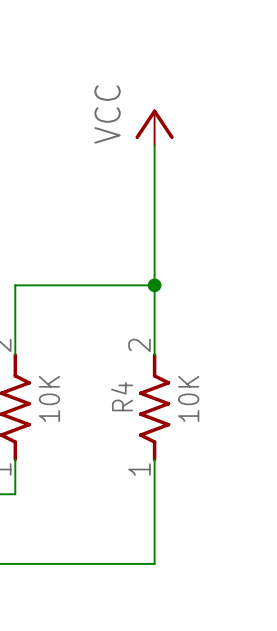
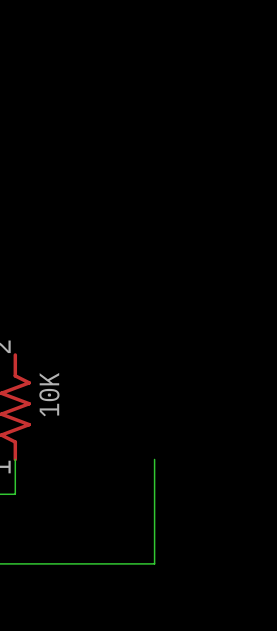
power symbol: VCC (154, 127) -> none
wire: (154, 146) (154, 354) -> none
wire: (154, 285) (15, 285) (15, 354) -> none
junction: (154, 285) -> none
R4: 10K (154, 407) -> none

